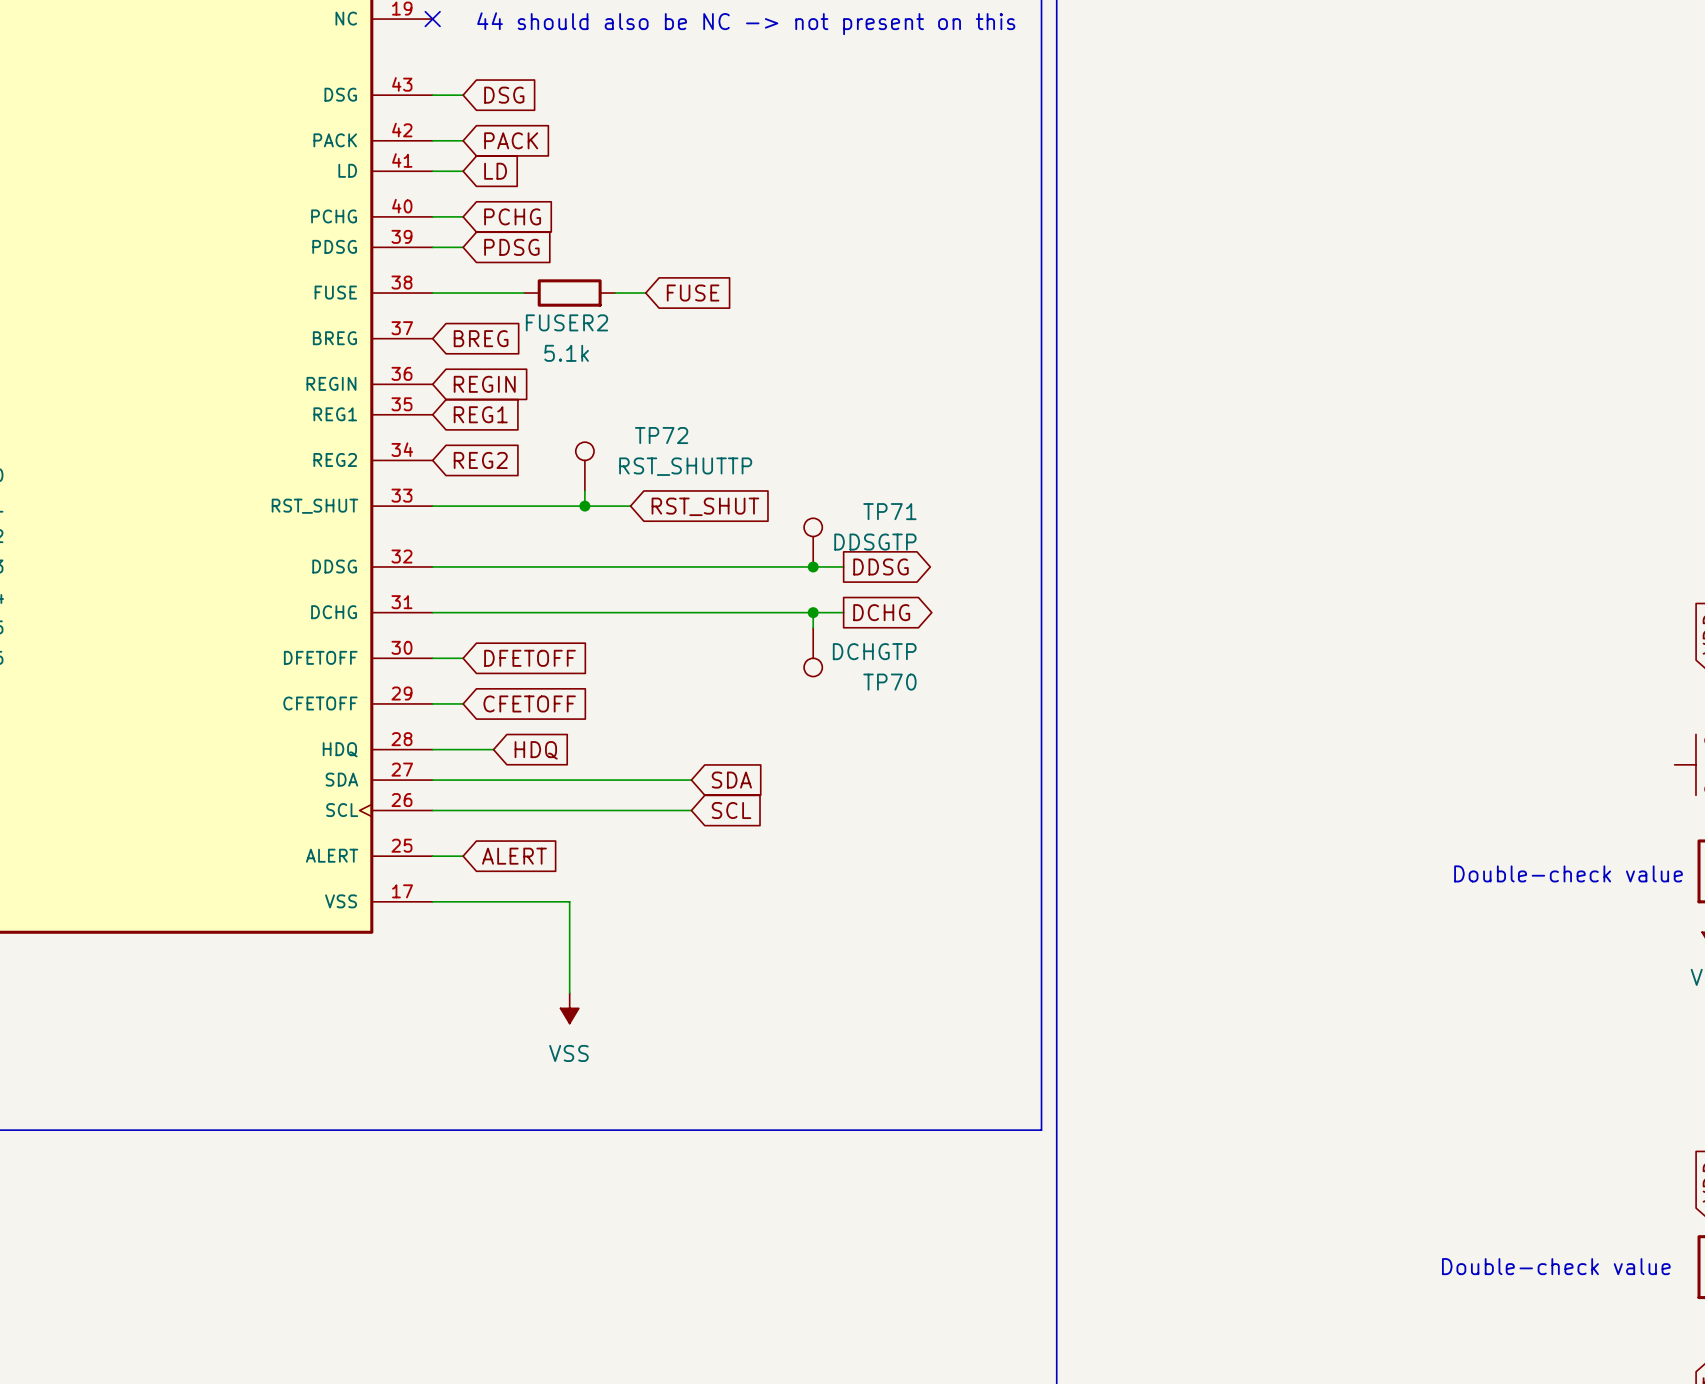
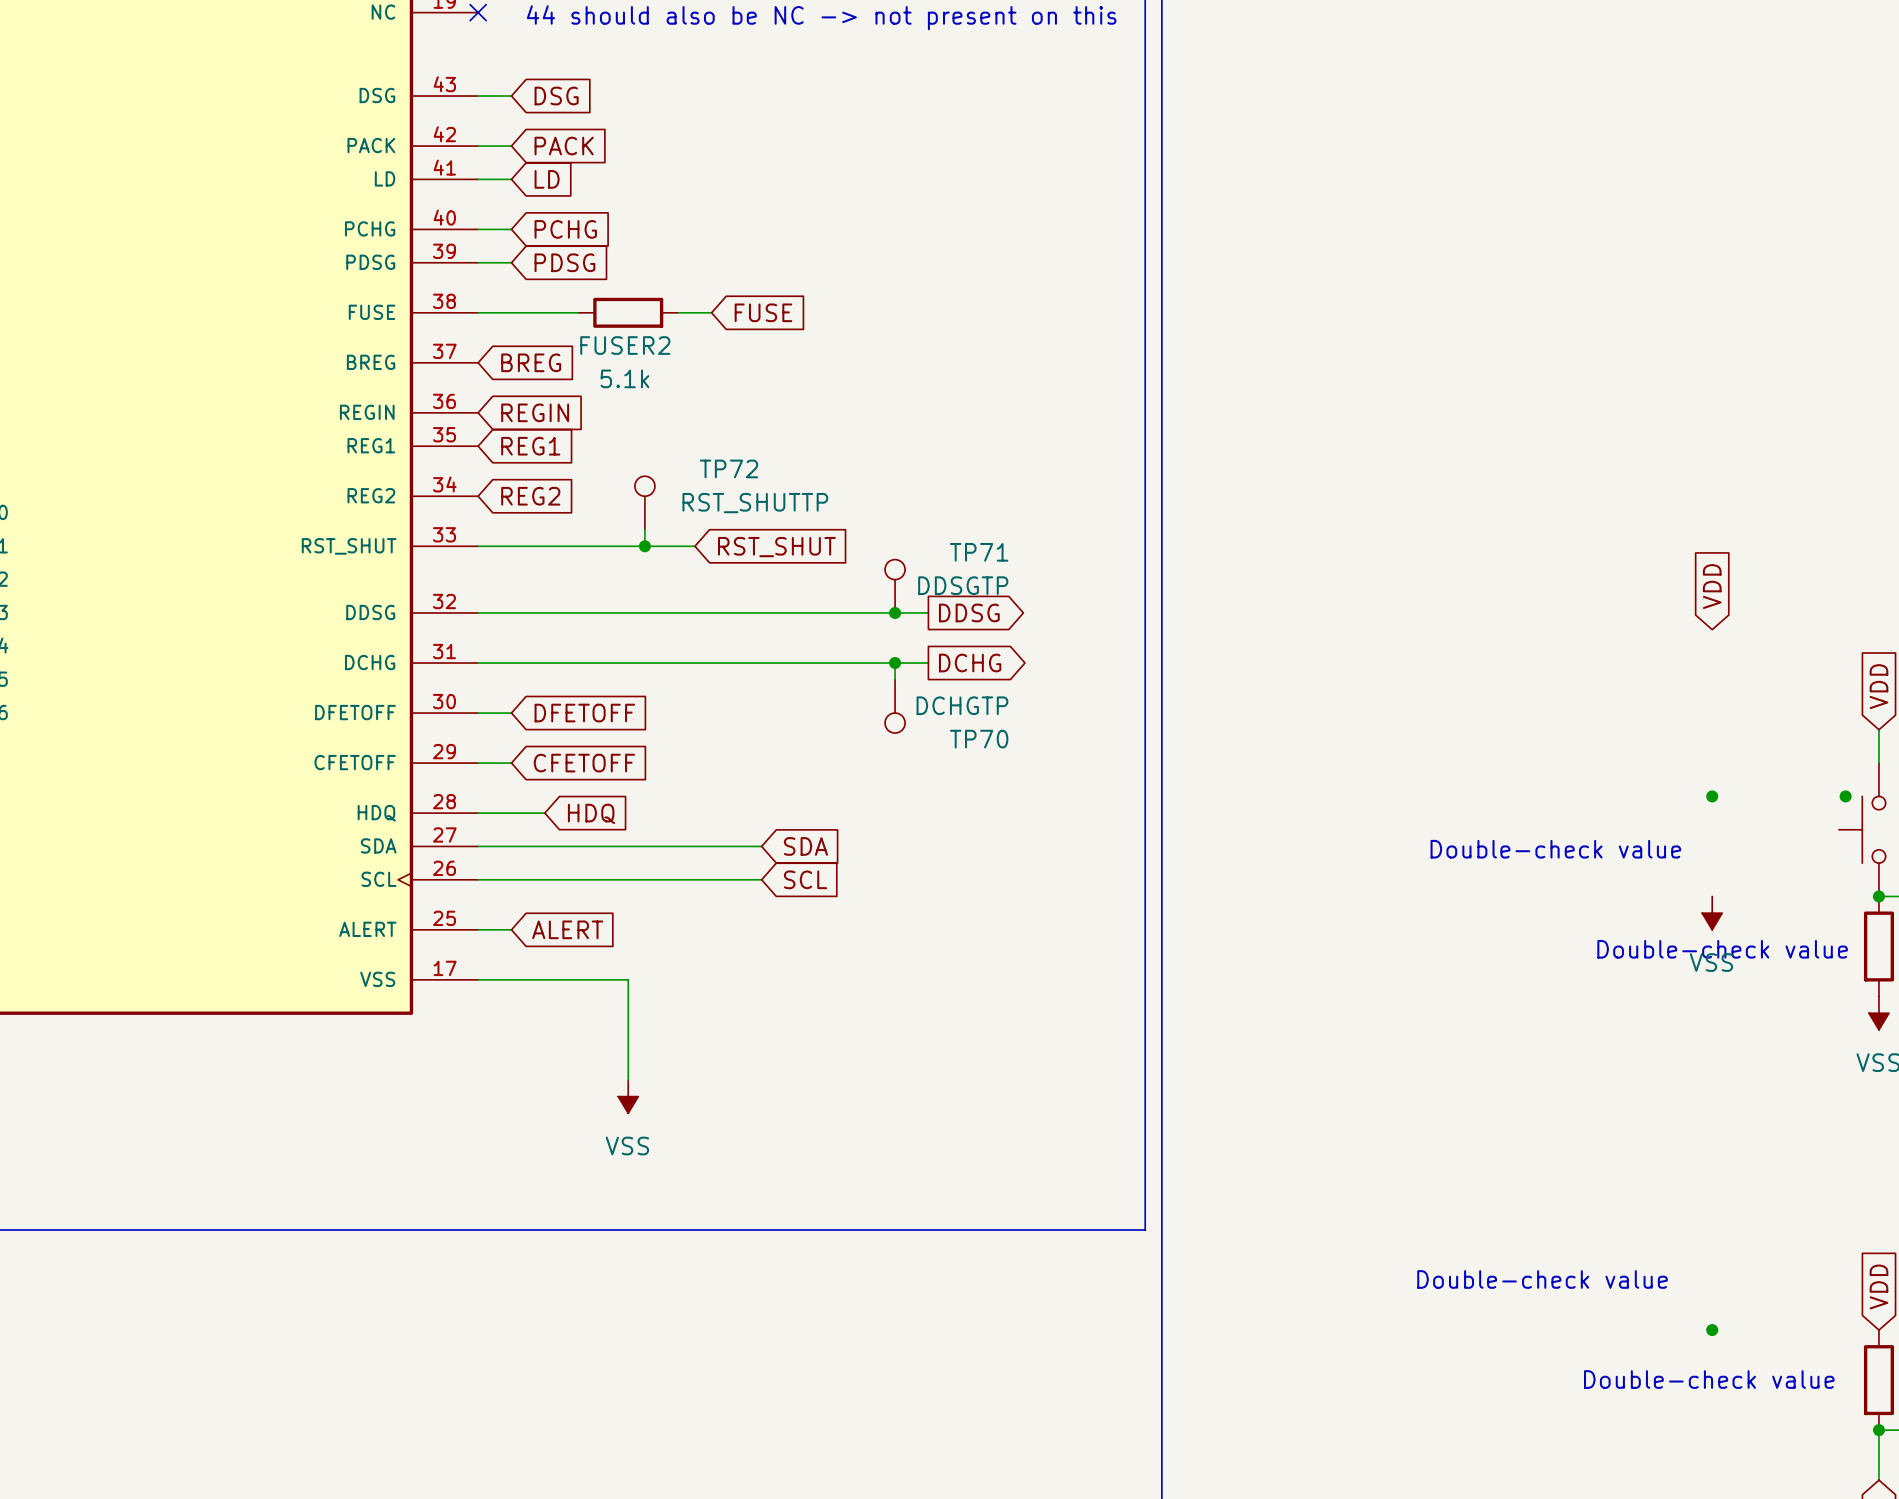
global label: none -> VDD (1712, 586)
junction: none -> (1712, 796)
junction: none -> (1845, 796)
text: none -> Double-check value (1555, 849)
power symbol: none -> VSS (1712, 913)
text: none -> Double-check value (1542, 1279)
junction: none -> (1712, 1330)

